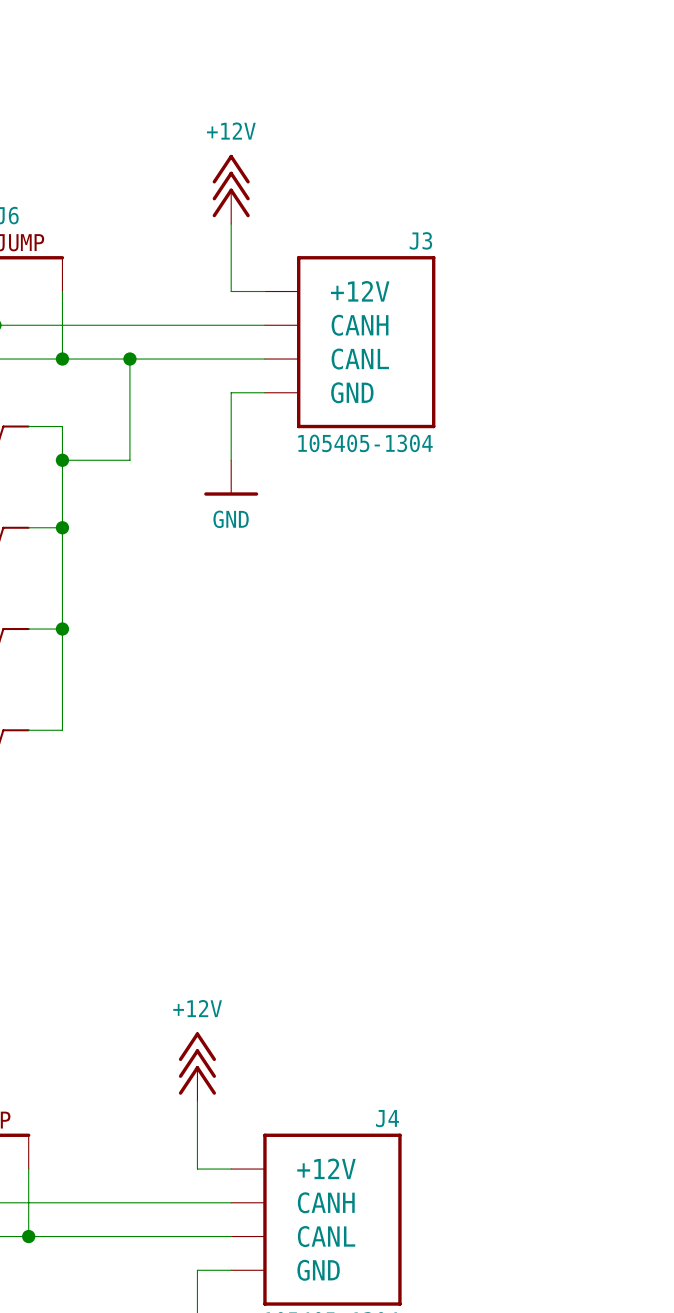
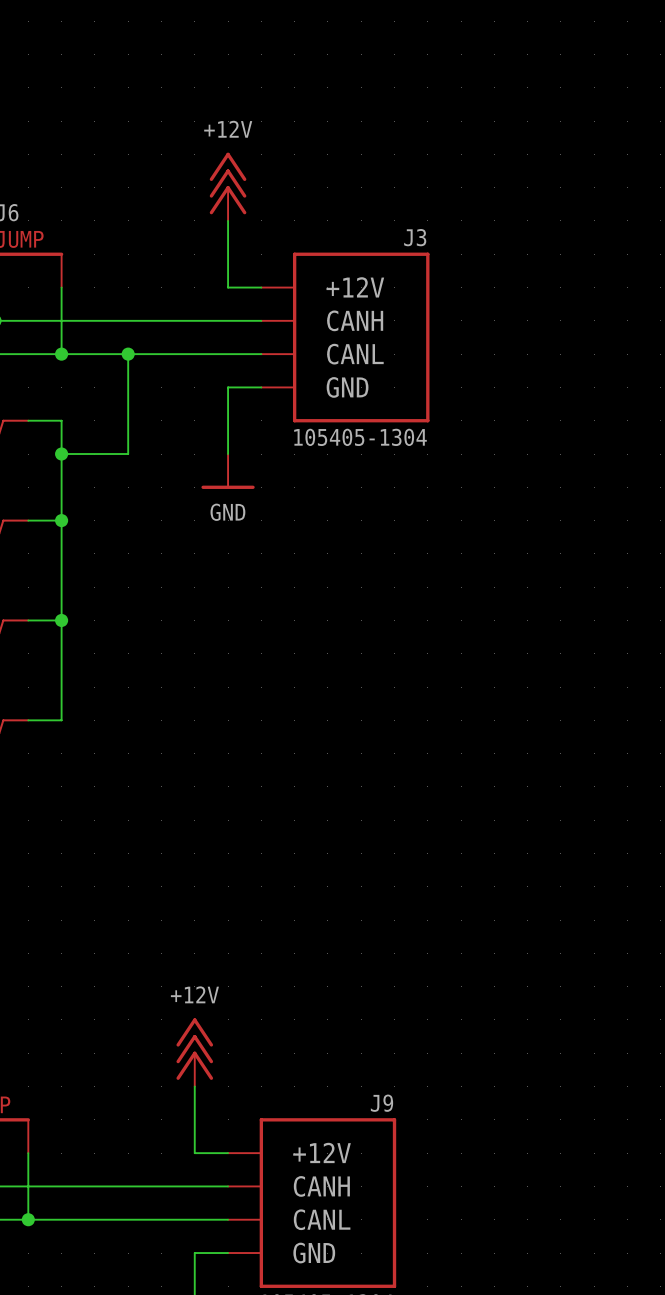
J4 name: J4 (387, 1118) -> J9 (381, 1103)

